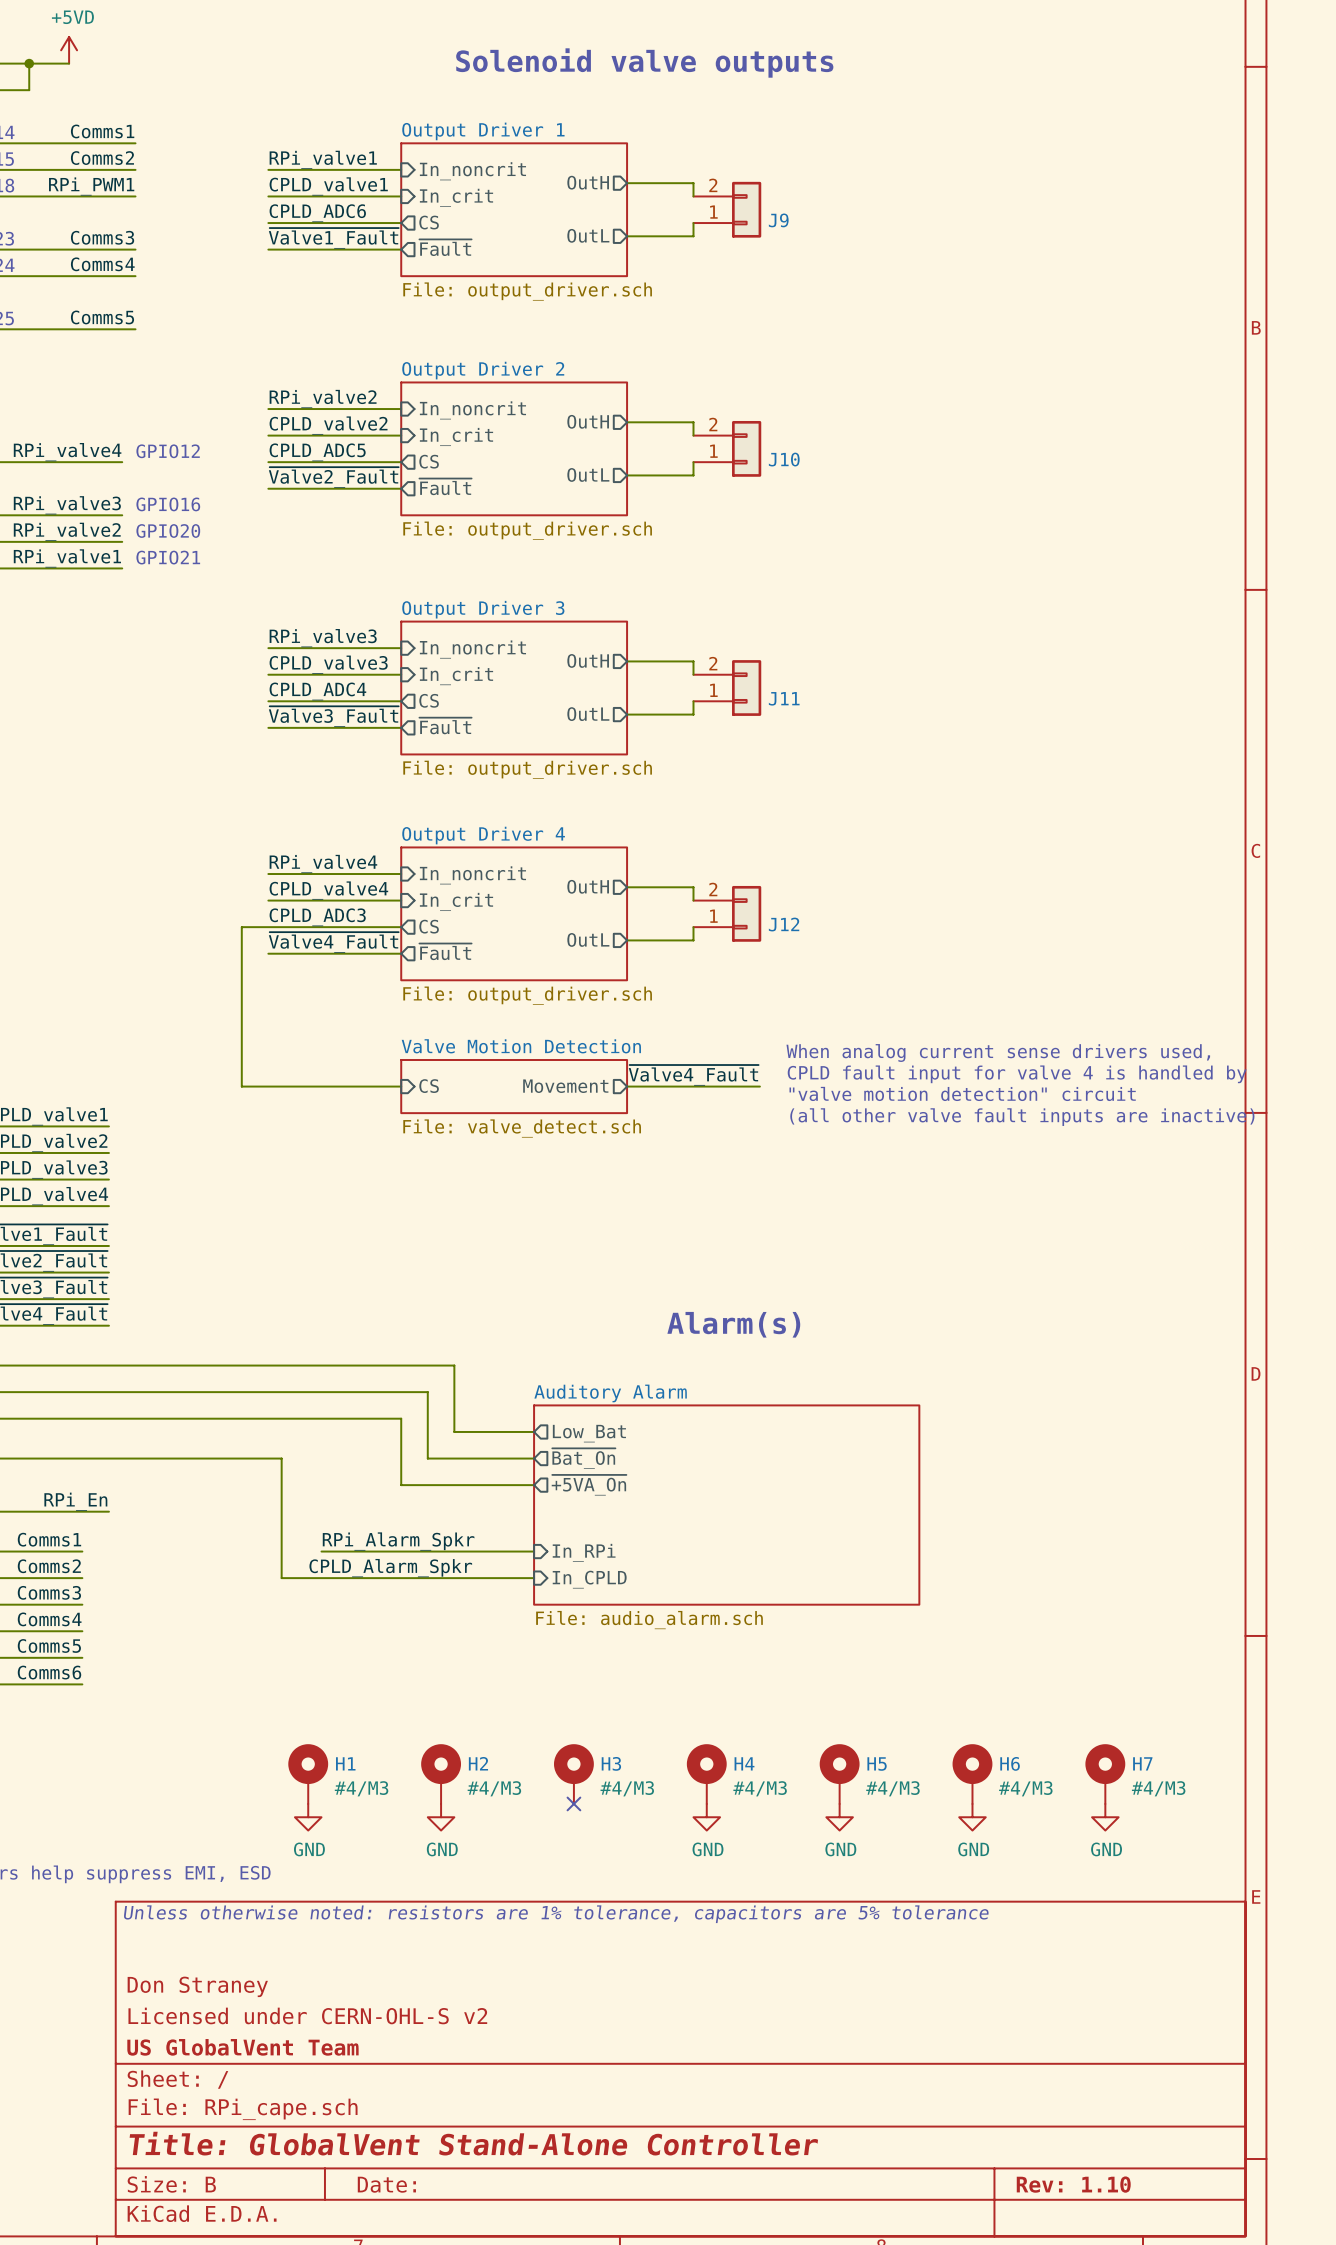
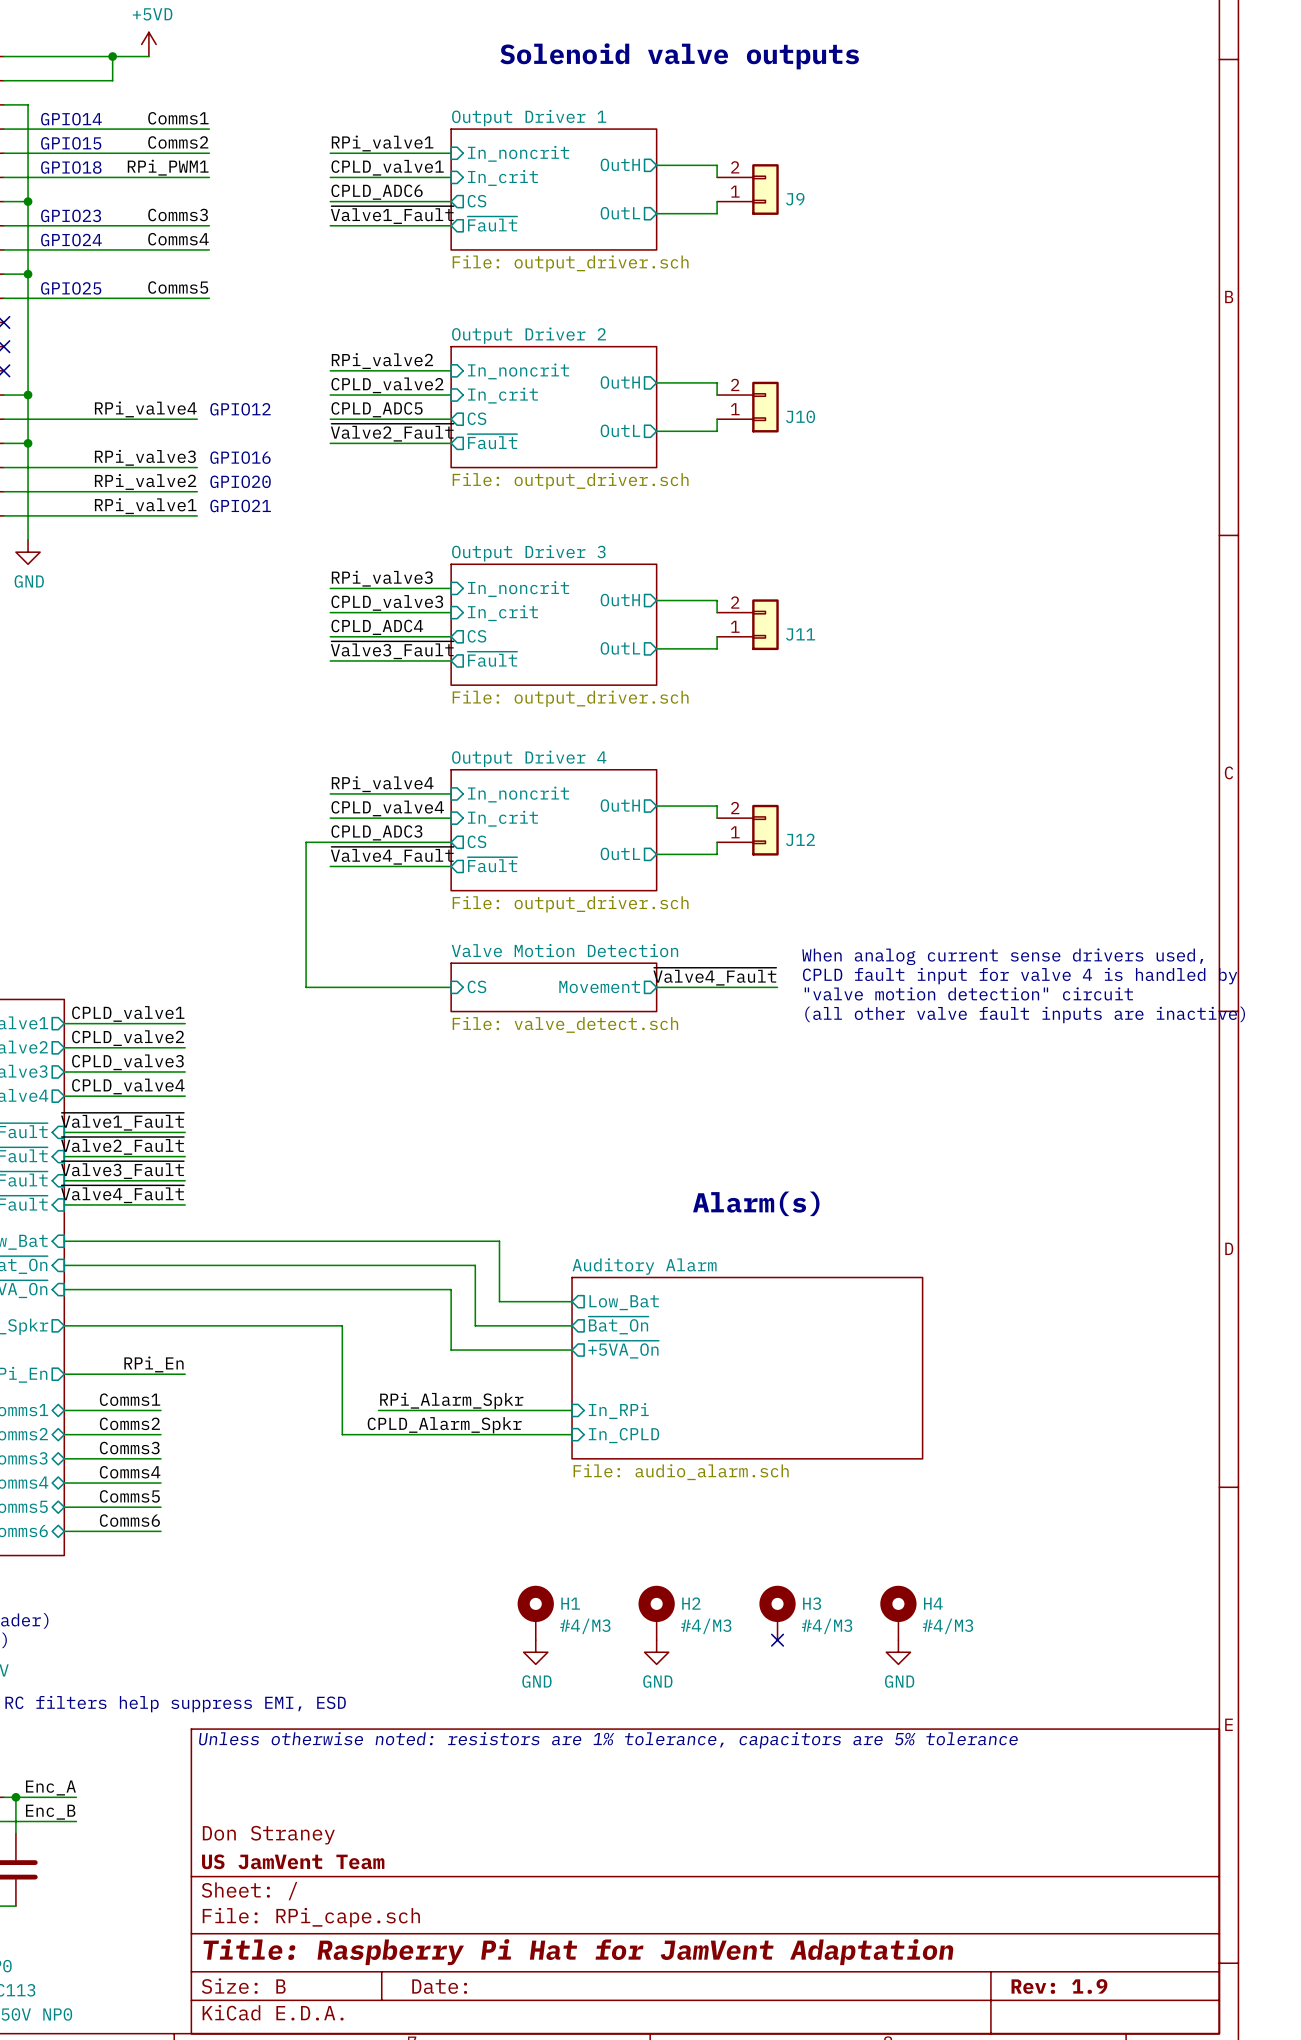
H1 position: (308, 1774) -> (535, 1612)
H2 position: (441, 1774) -> (656, 1612)
H3 position: (573, 1774) -> (777, 1612)
H4 position: (706, 1774) -> (898, 1612)
H5: #4/M3 (839, 1774) -> none
H6: #4/M3 (972, 1774) -> none
H7: #4/M3 (1105, 1774) -> none
no-connect mark: (573, 1803) -> none
no-connect mark: none -> (777, 1640)
power symbol: GND (308, 1817) -> none
power symbol position: GND (441, 1817) -> GND (535, 1652)
power symbol position: GND (706, 1817) -> GND (656, 1652)
power symbol: GND (839, 1817) -> none
power symbol: none -> GND (898, 1652)
power symbol: GND (972, 1817) -> none
power symbol: GND (1105, 1817) -> none
title block: Don Straney (197, 1986) -> none
title block: Licensed under CERN-OHL-S v2 (307, 2015) -> Don Straney (268, 1835)
title block: US GlobalVent Team (242, 2047) -> US JamVent Team (293, 1861)
title block: Title: GlobalVent Stand-Alone Controller (473, 2143) -> Title: Raspberry Pi Hat for JamVent Adaptation (578, 1952)
title block: Rev: 1.10 (1073, 2184) -> Rev: 1.9 (1059, 1986)

